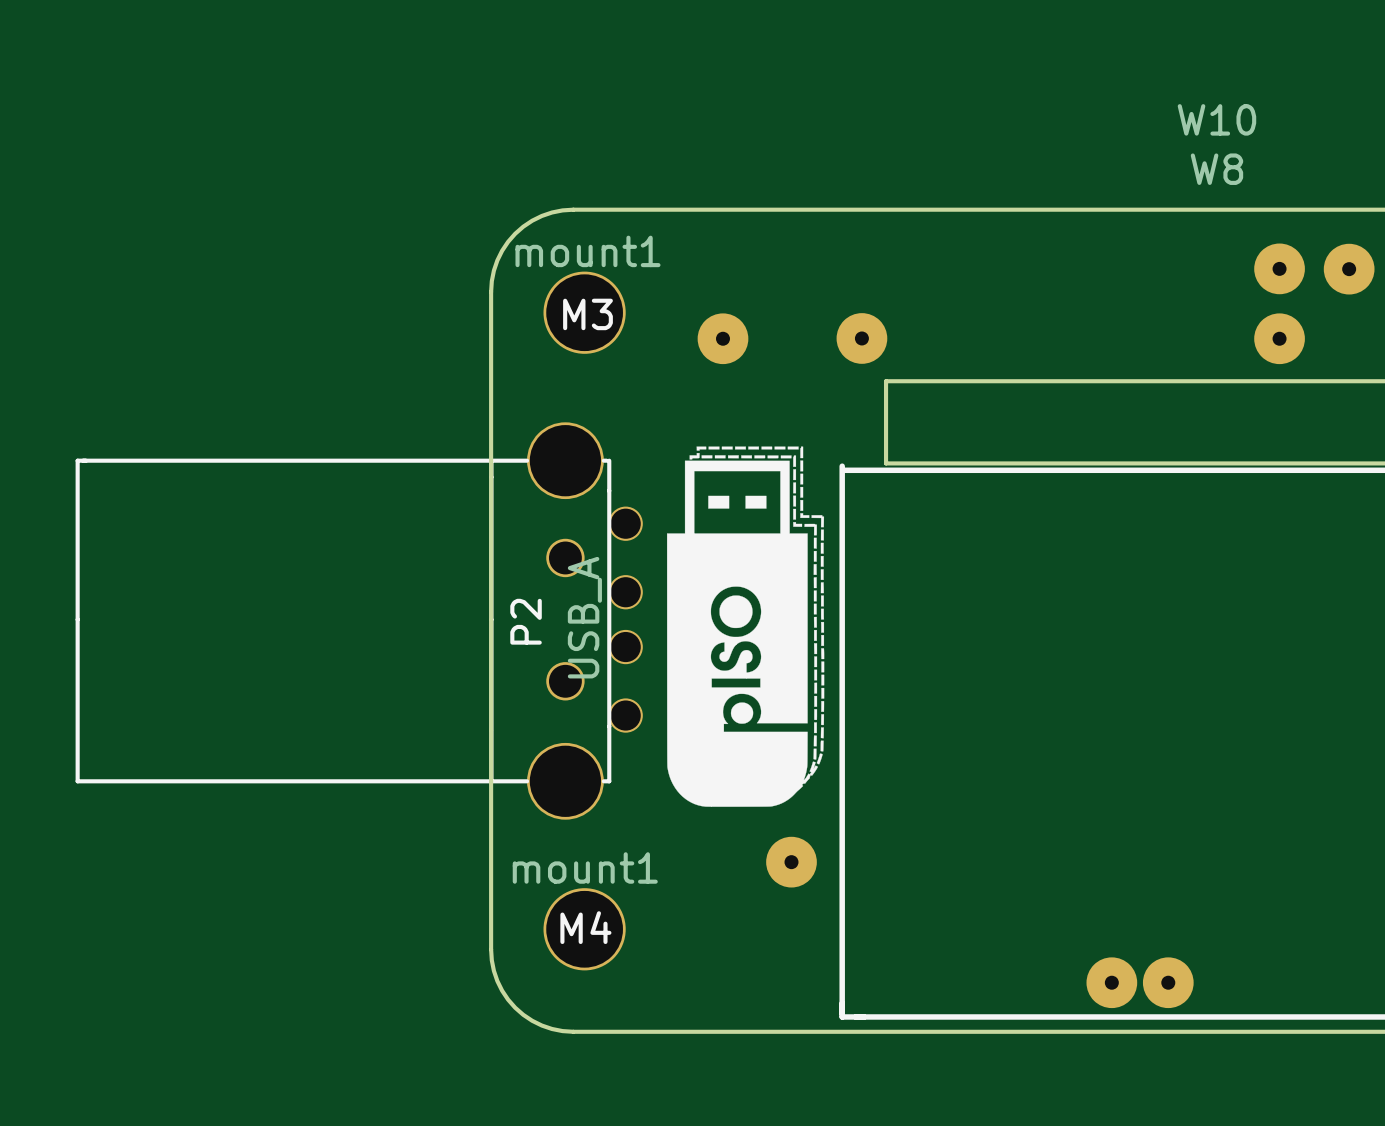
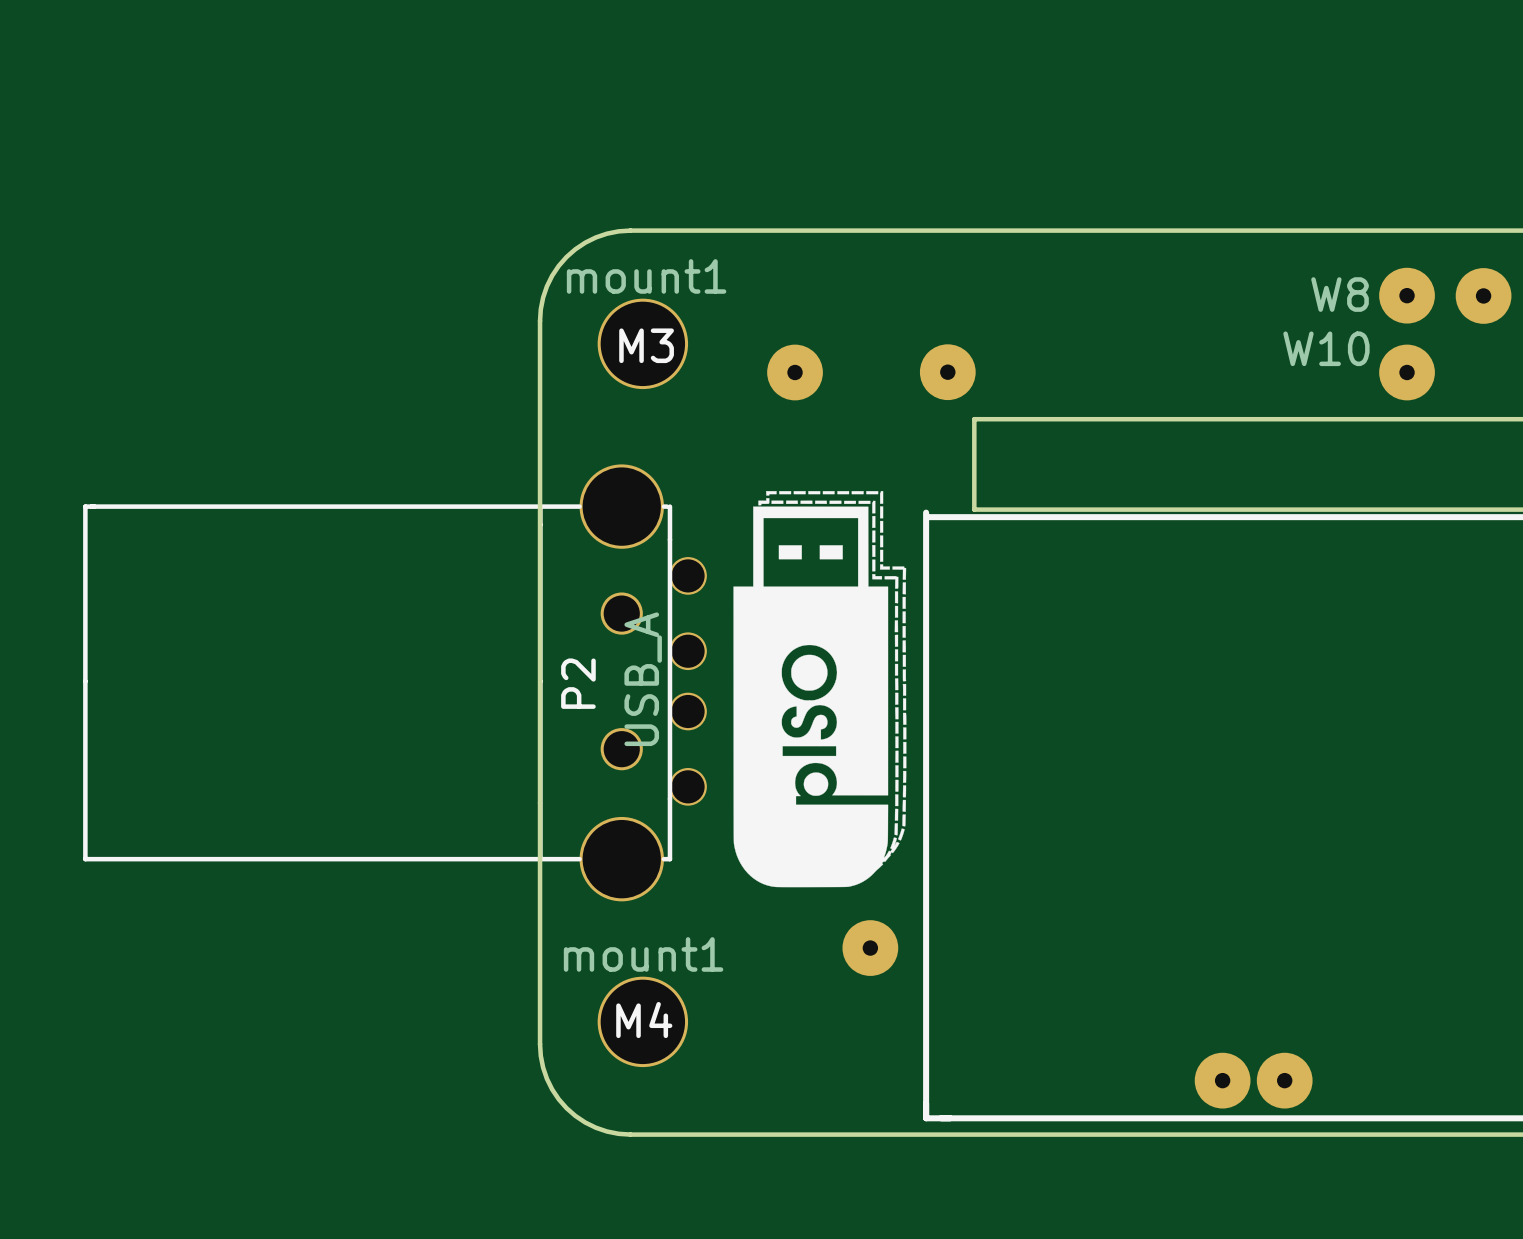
W10 name position: W10 (1216, 119) -> W10 (1326, 348)
W8 name position: W8 (1216, 169) -> W8 (1340, 294)

